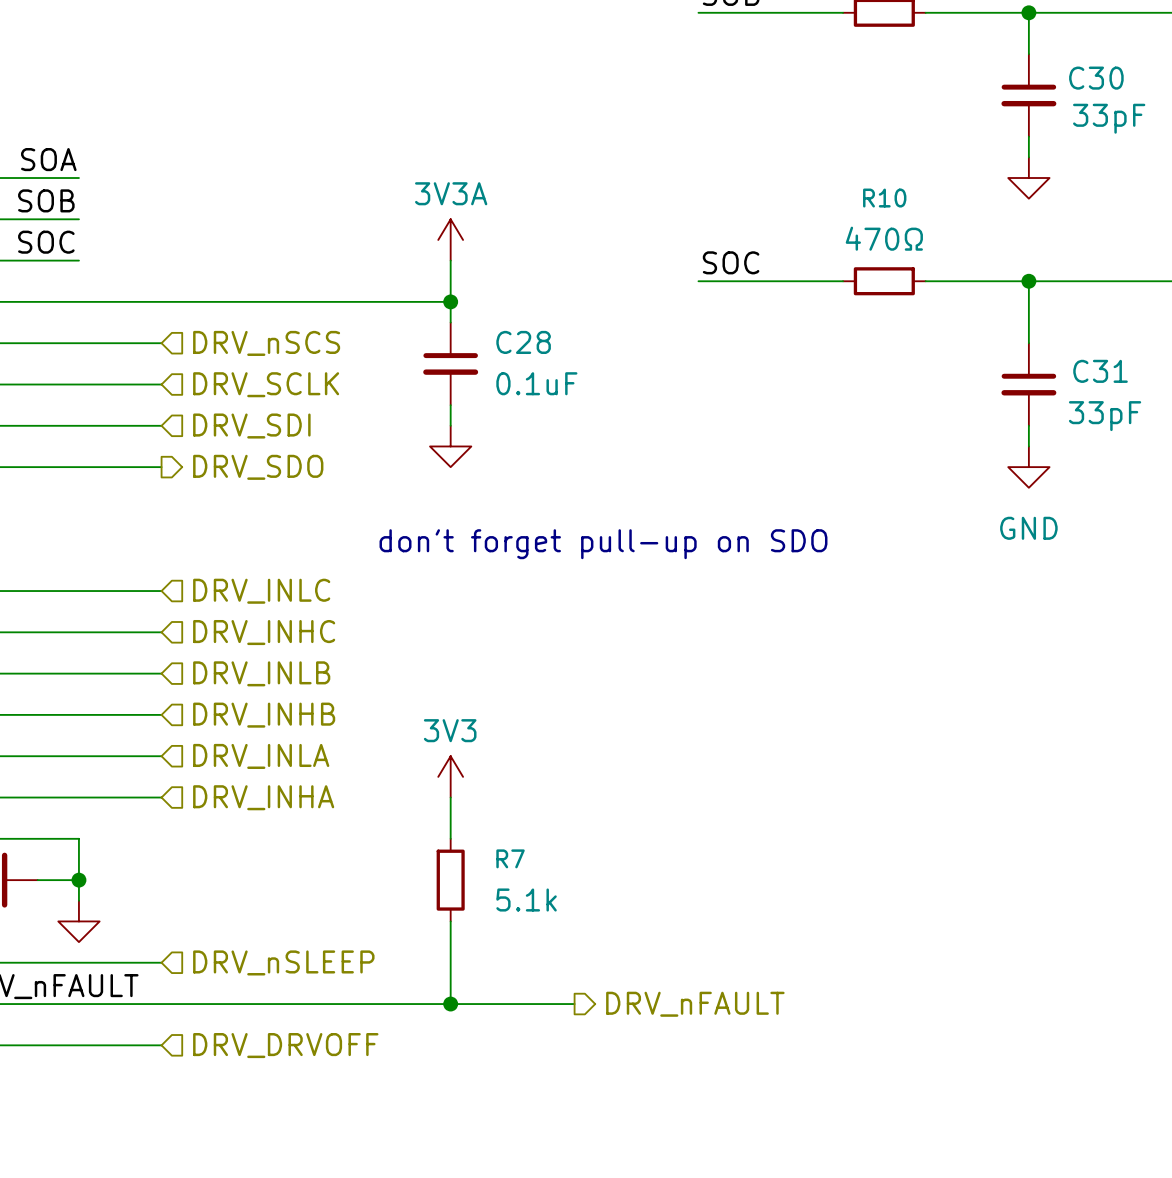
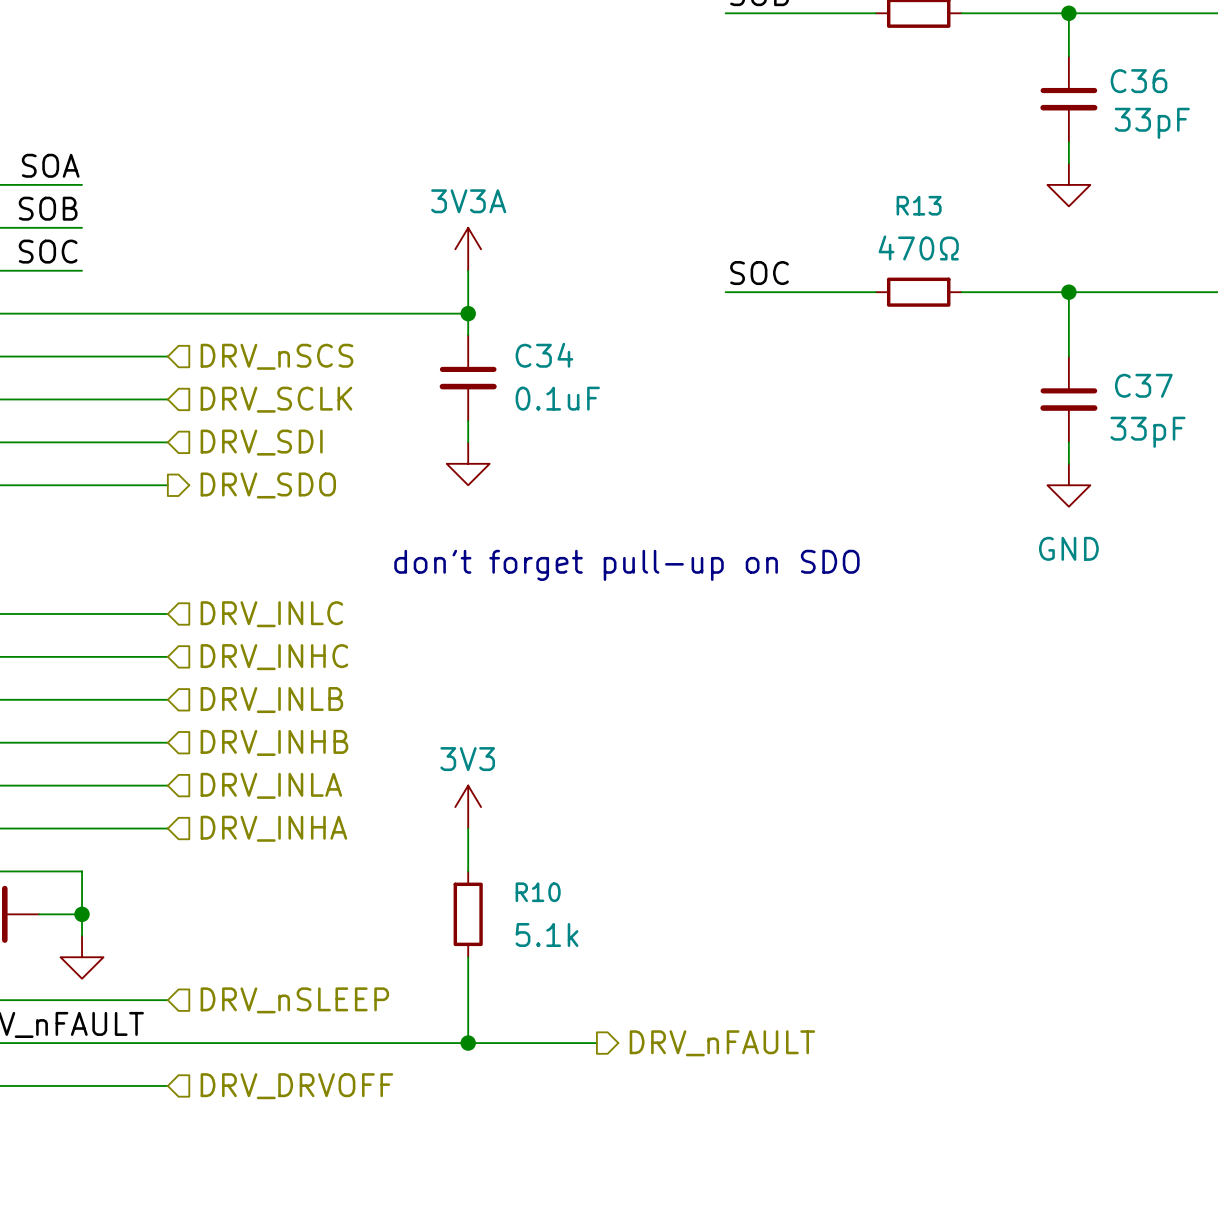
C30 name: C30 (1096, 78) -> C36 (1139, 81)
R10 name: R10 (884, 198) -> R13 (919, 205)
C28 name: C28 (523, 342) -> C34 (544, 355)
C31 name: C31 (1100, 371) -> C37 (1143, 385)
R7 name: R7 (510, 858) -> R10 (538, 892)

